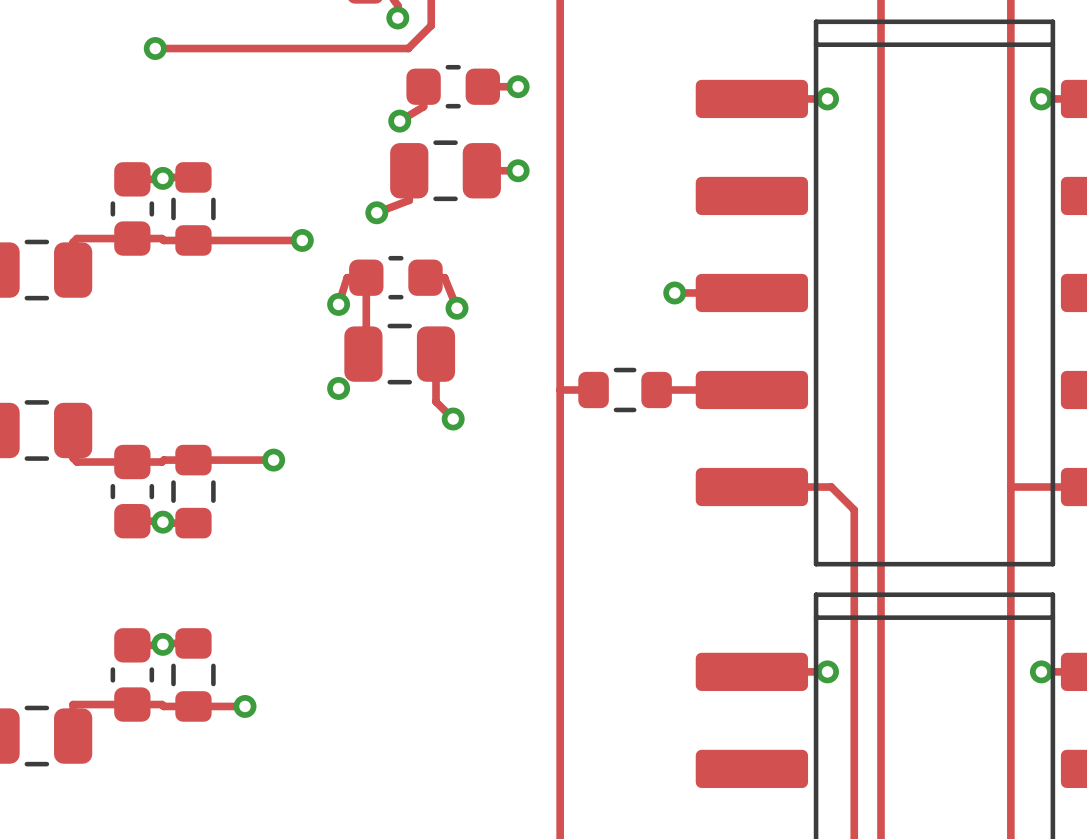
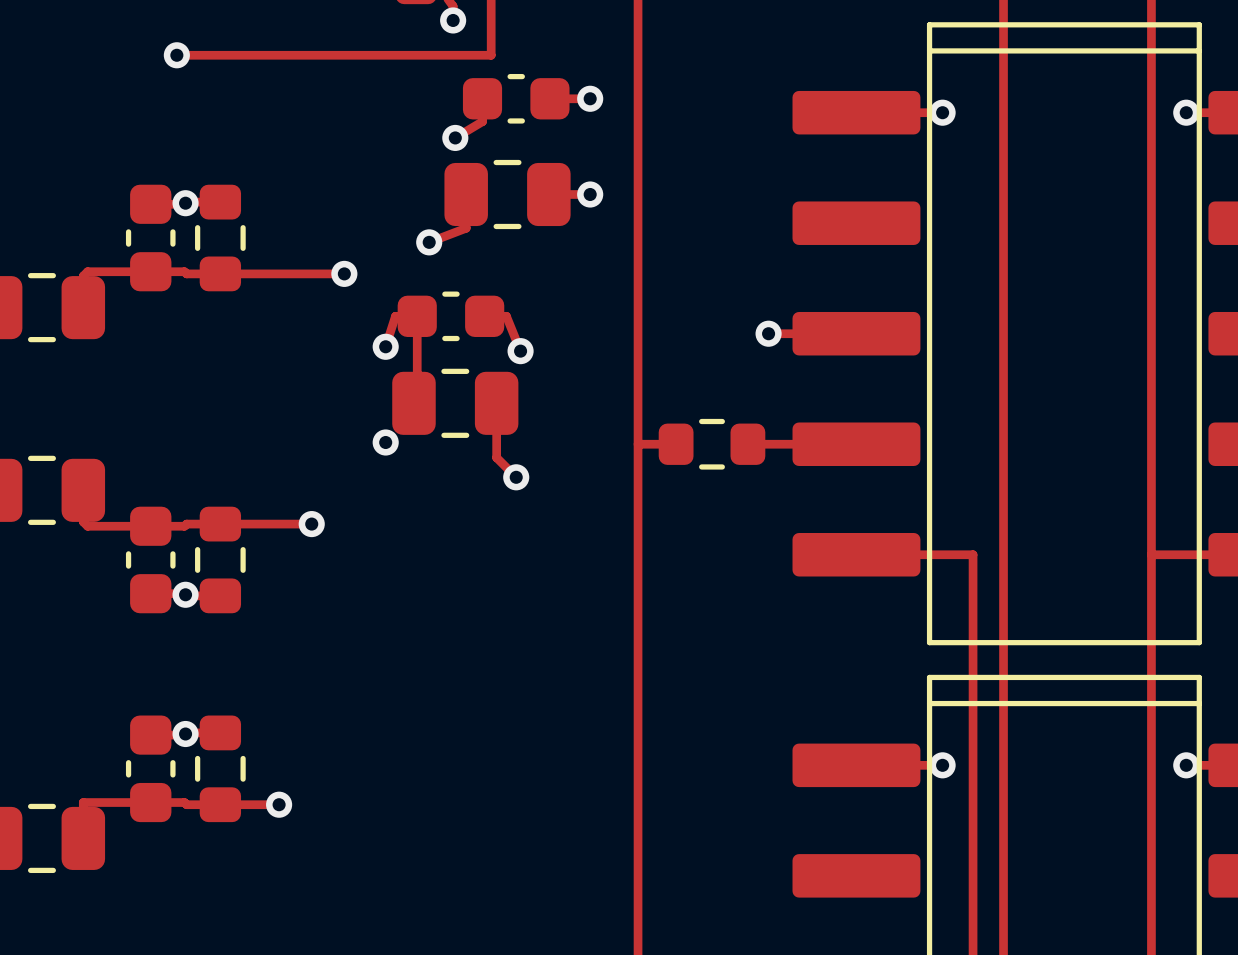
track: (431, 25) (408, 48) -> (491, 29) (491, 55) (465, 55)
track: (831, 487) (854, 509) -> (946, 554) (973, 554) (973, 580)

